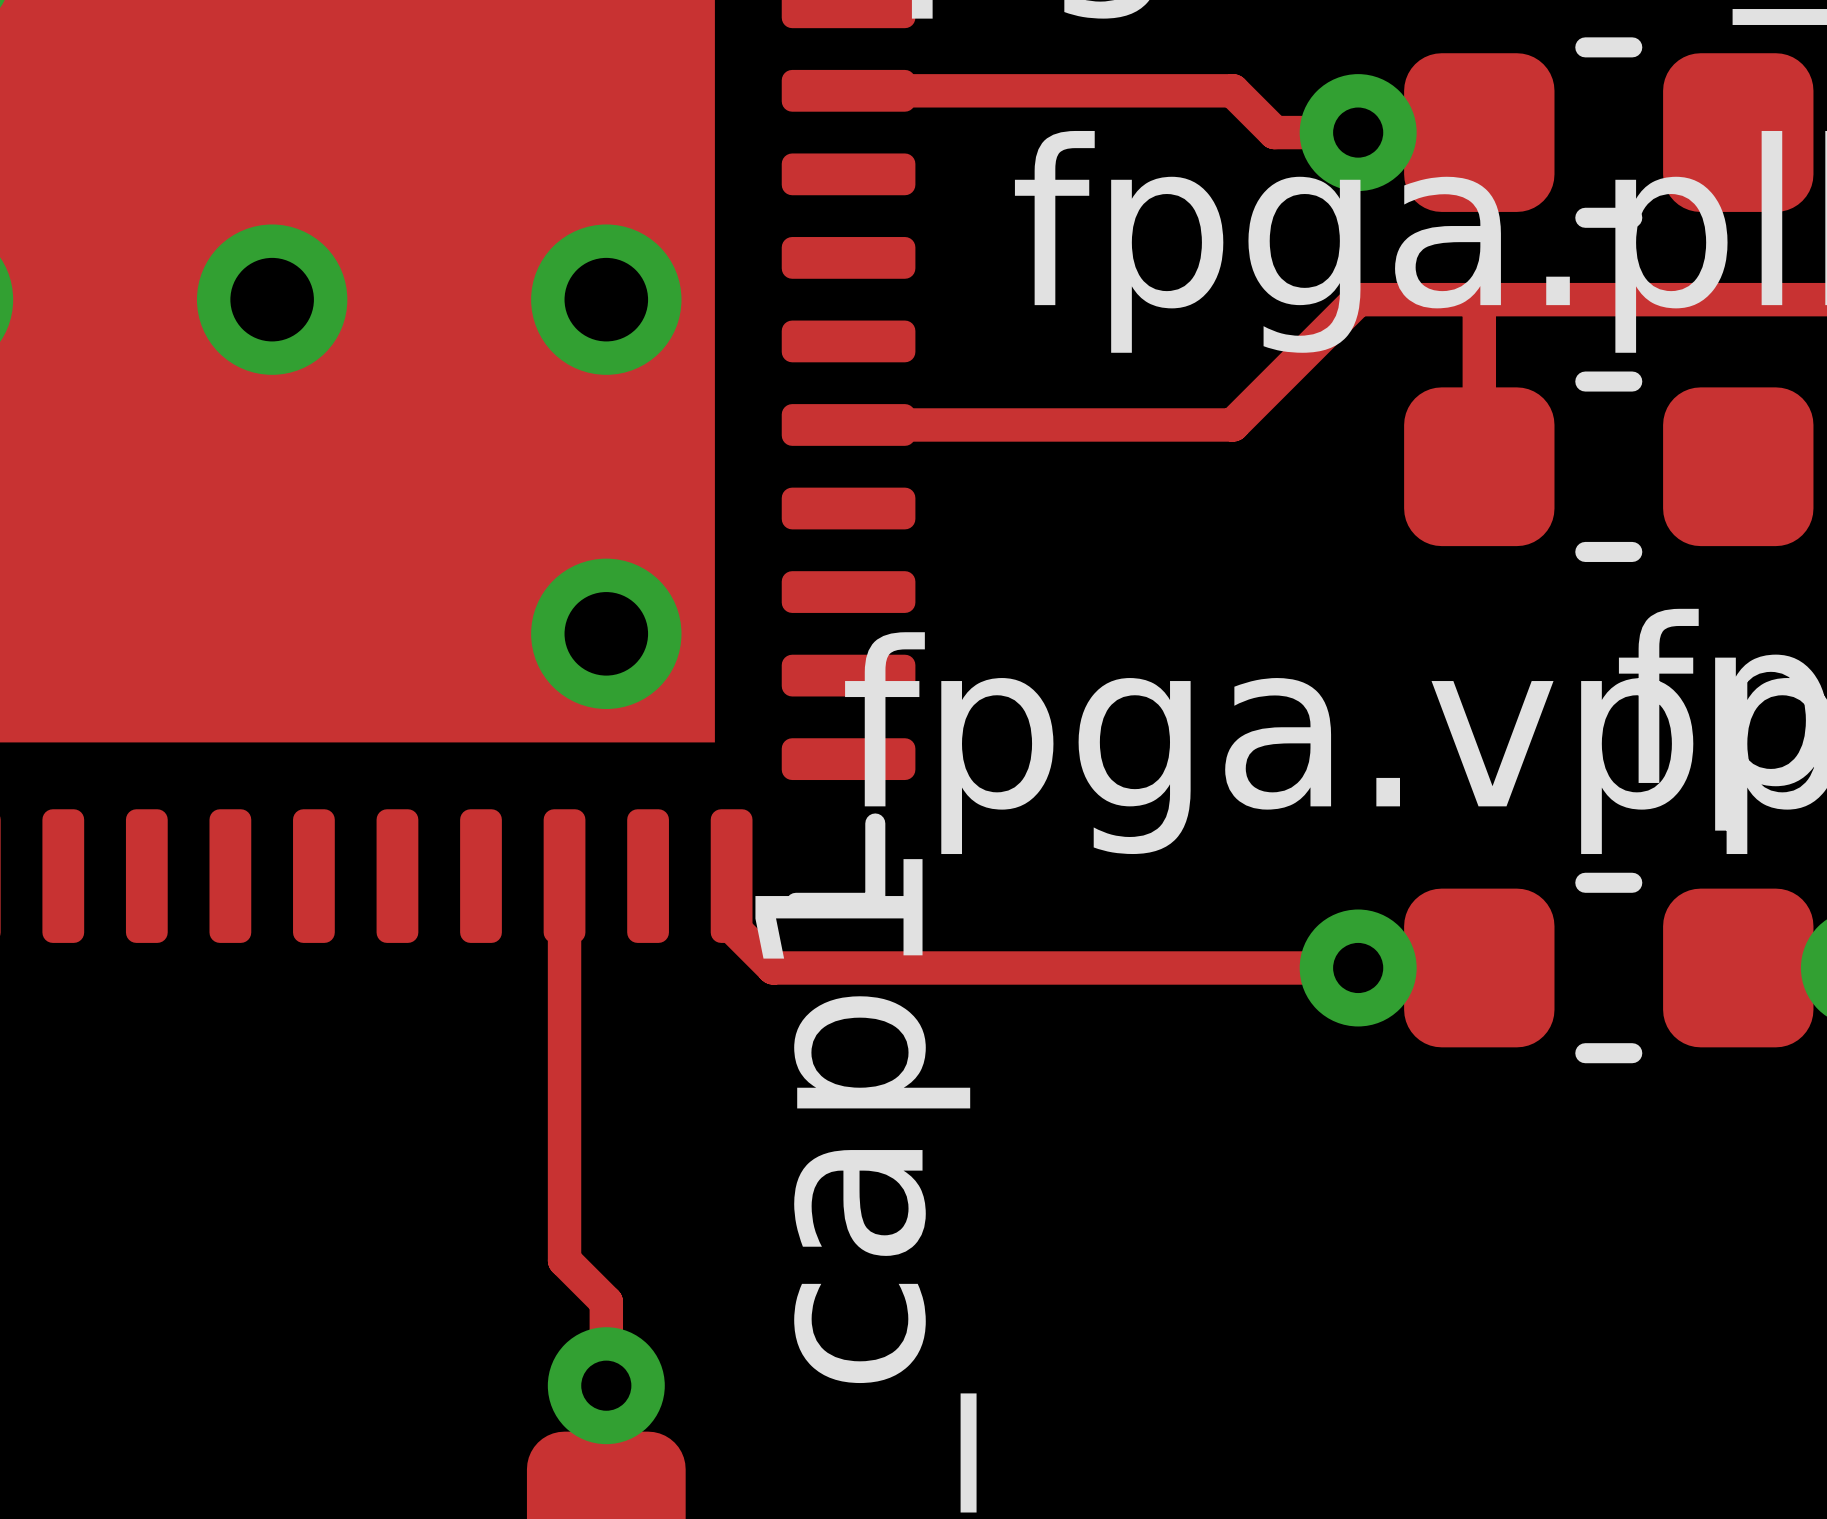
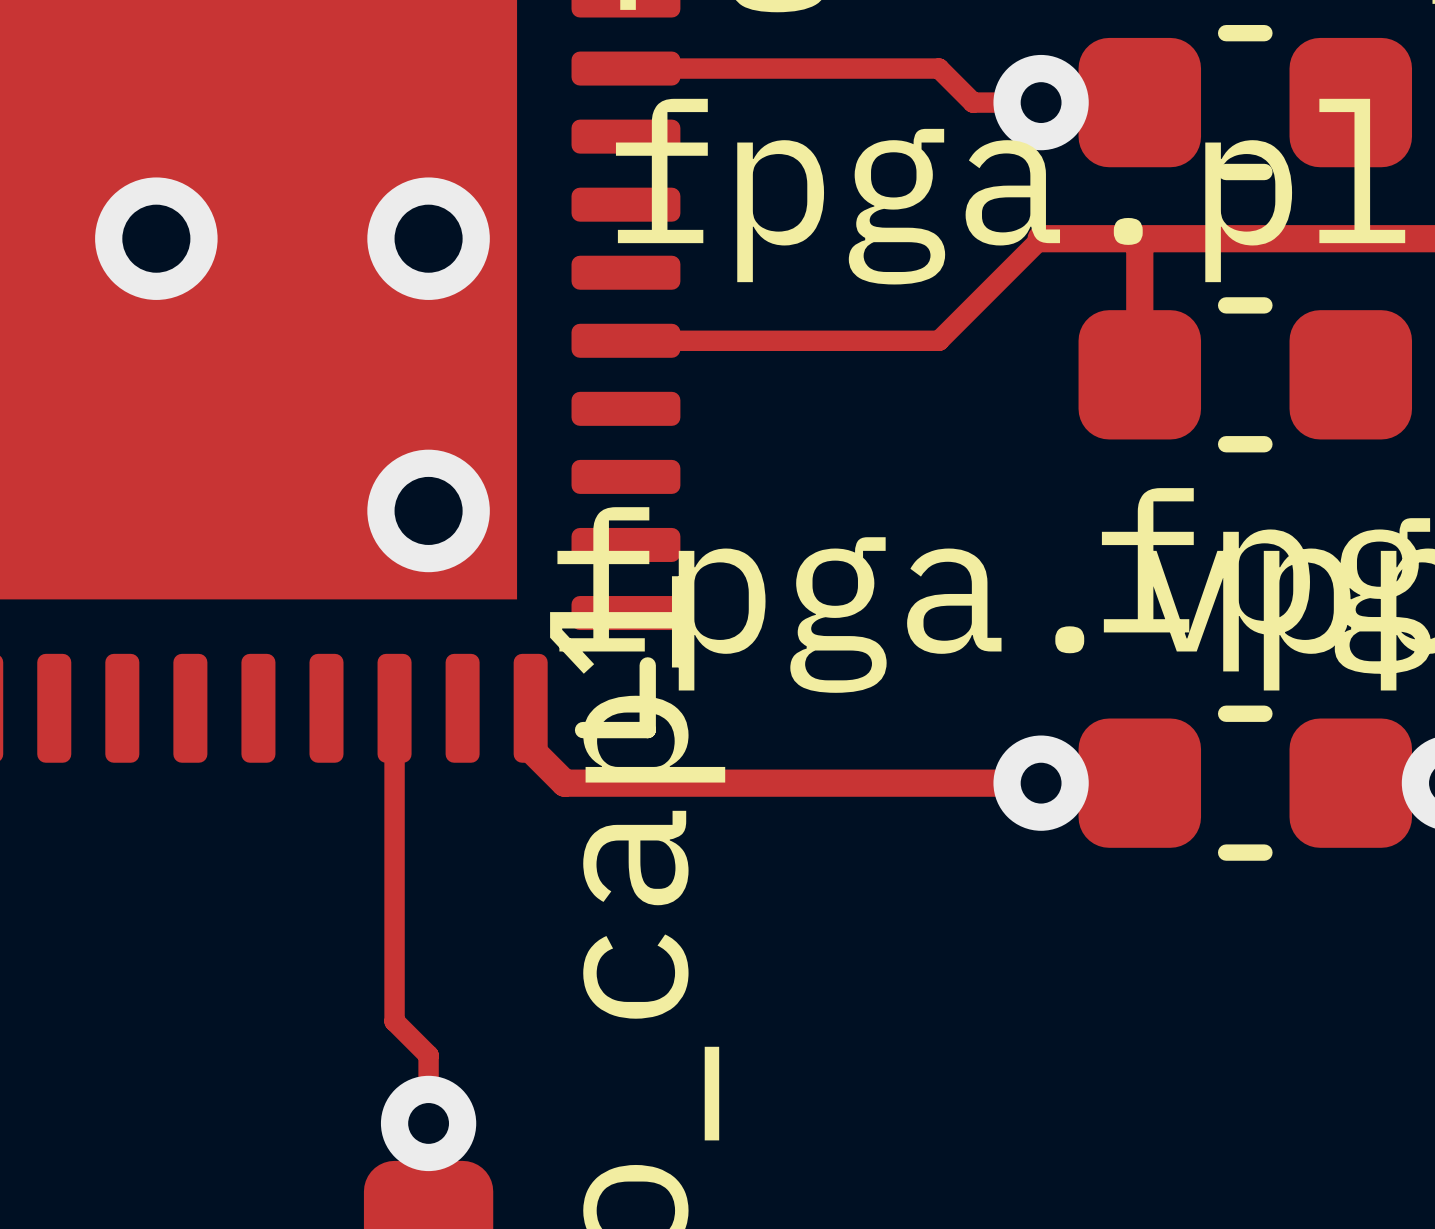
top track width: thick (848, 90) (1232, 90) (1274, 132) (1358, 132) -> thin (625, 68) (939, 68) (973, 102) (1041, 102)
top track width: thick (1358, 299) (1232, 424) (848, 424) -> thin (1041, 238) (939, 340) (625, 340)
top track width: thick (564, 876) (564, 1260) (606, 1302) (606, 1385) -> thin (394, 708) (394, 1021) (428, 1055) (428, 1123)

